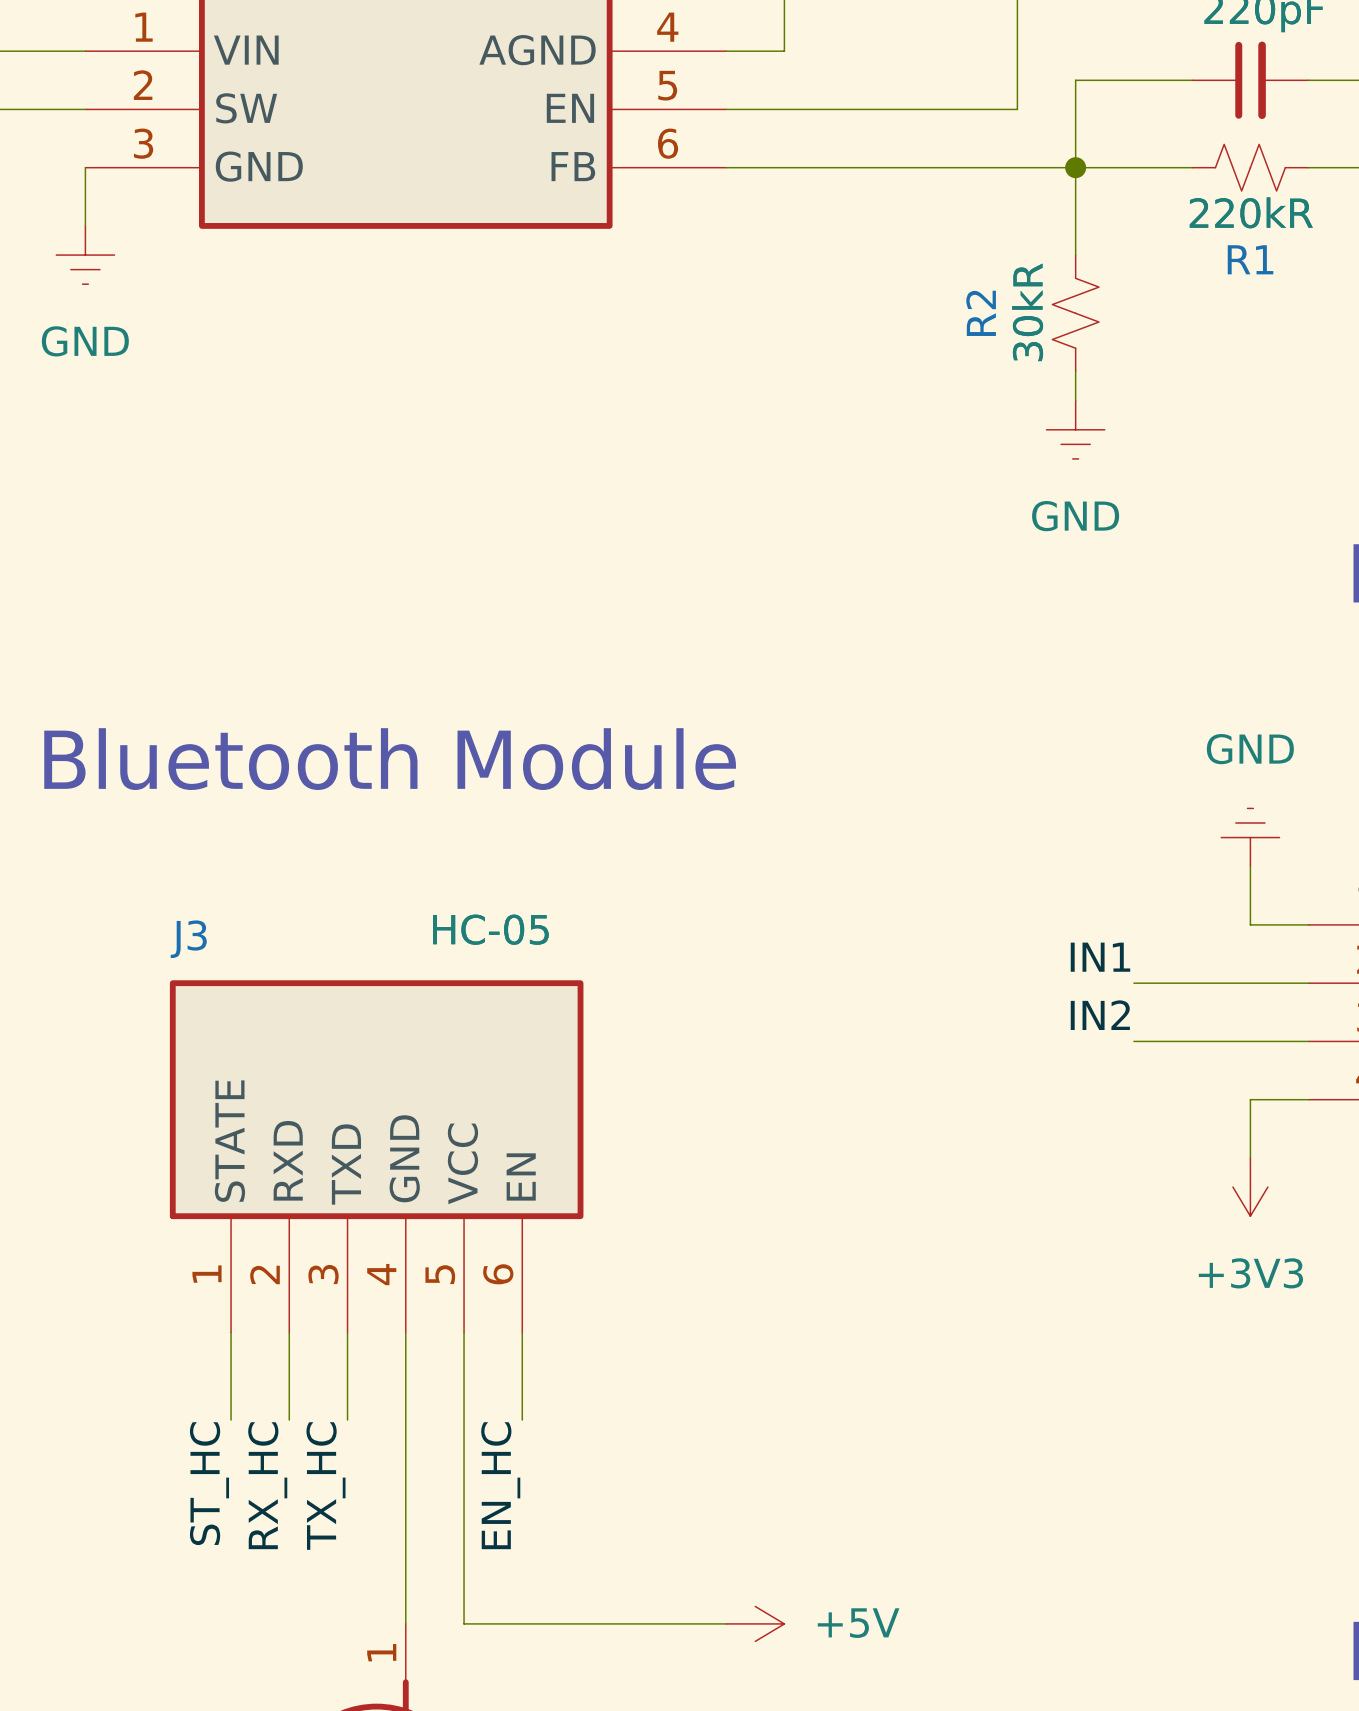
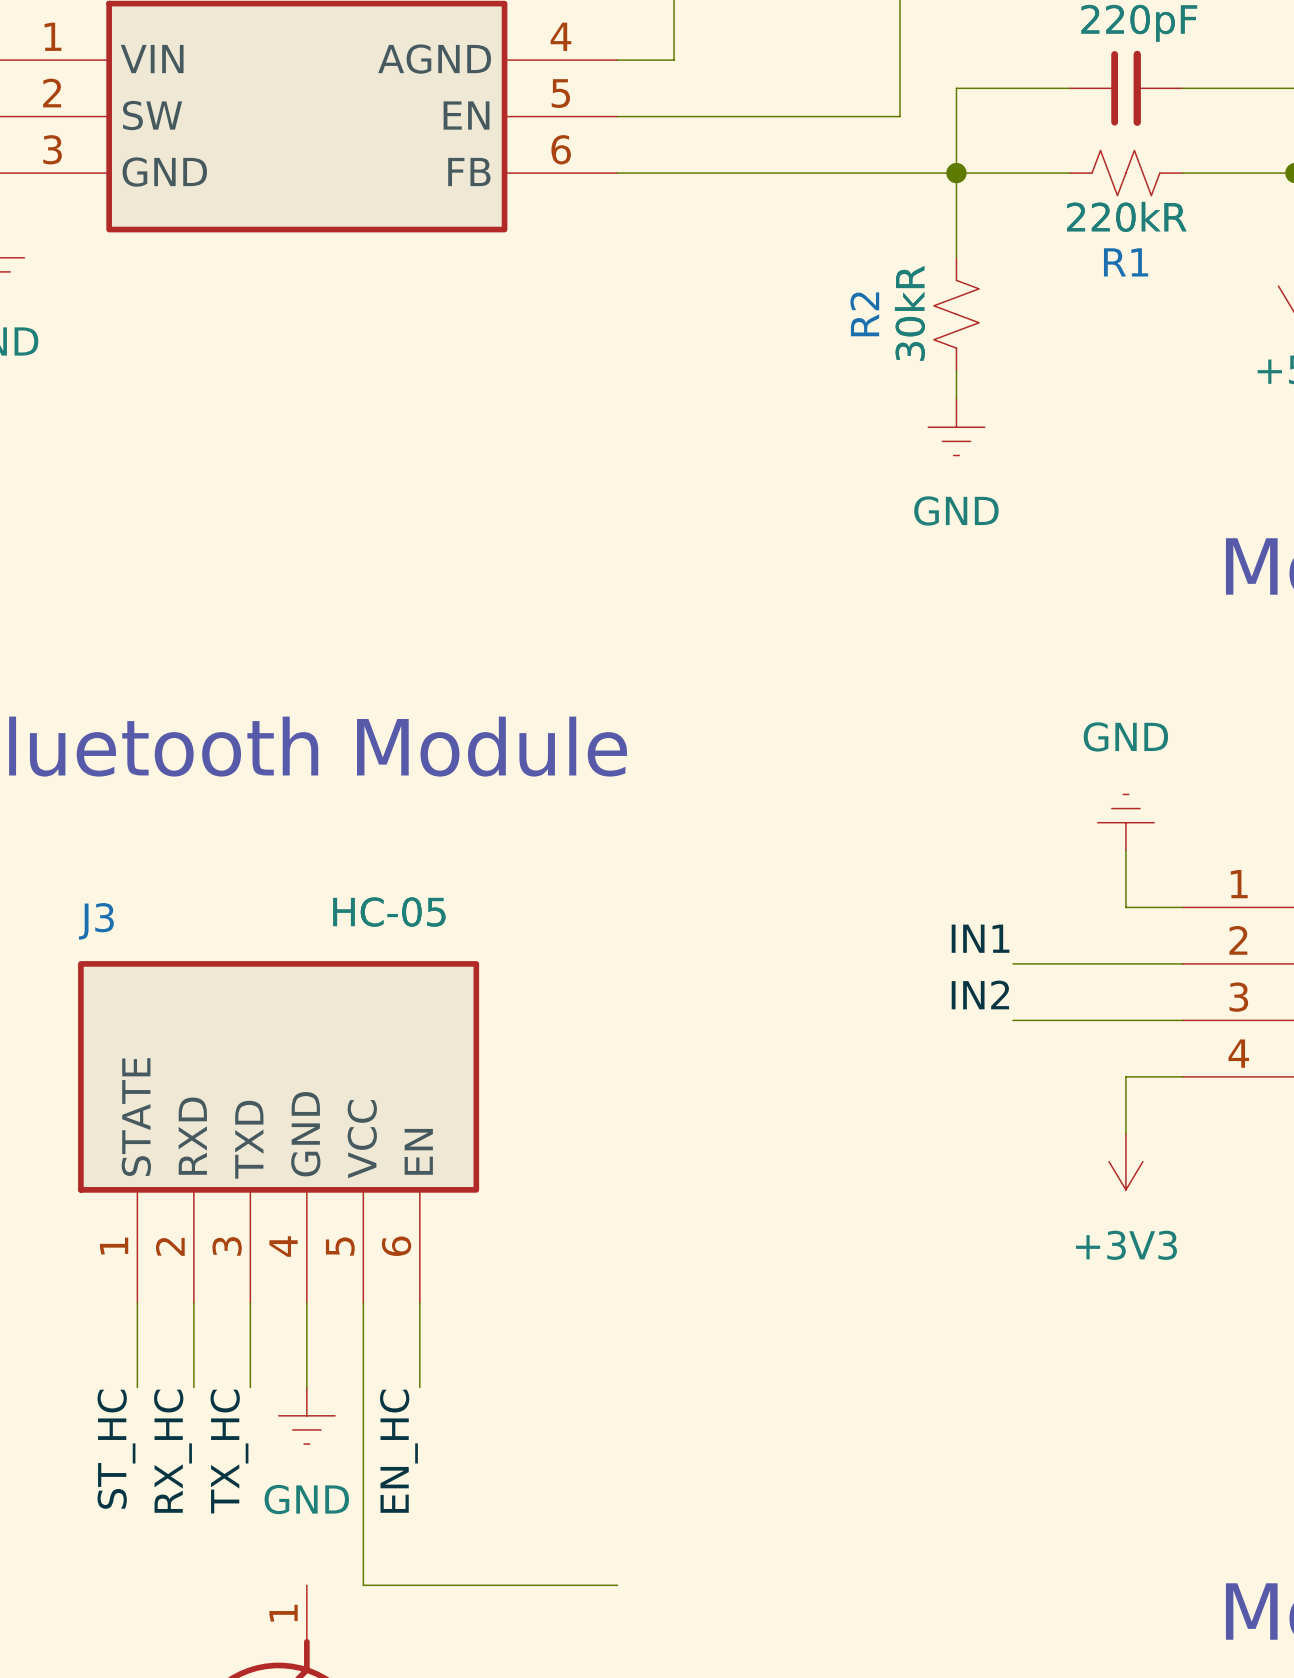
wire: (405, 1420) (405, 1623) -> none
power symbol: none -> GND (306, 1415)
power symbol: +5V (755, 1623) -> none

